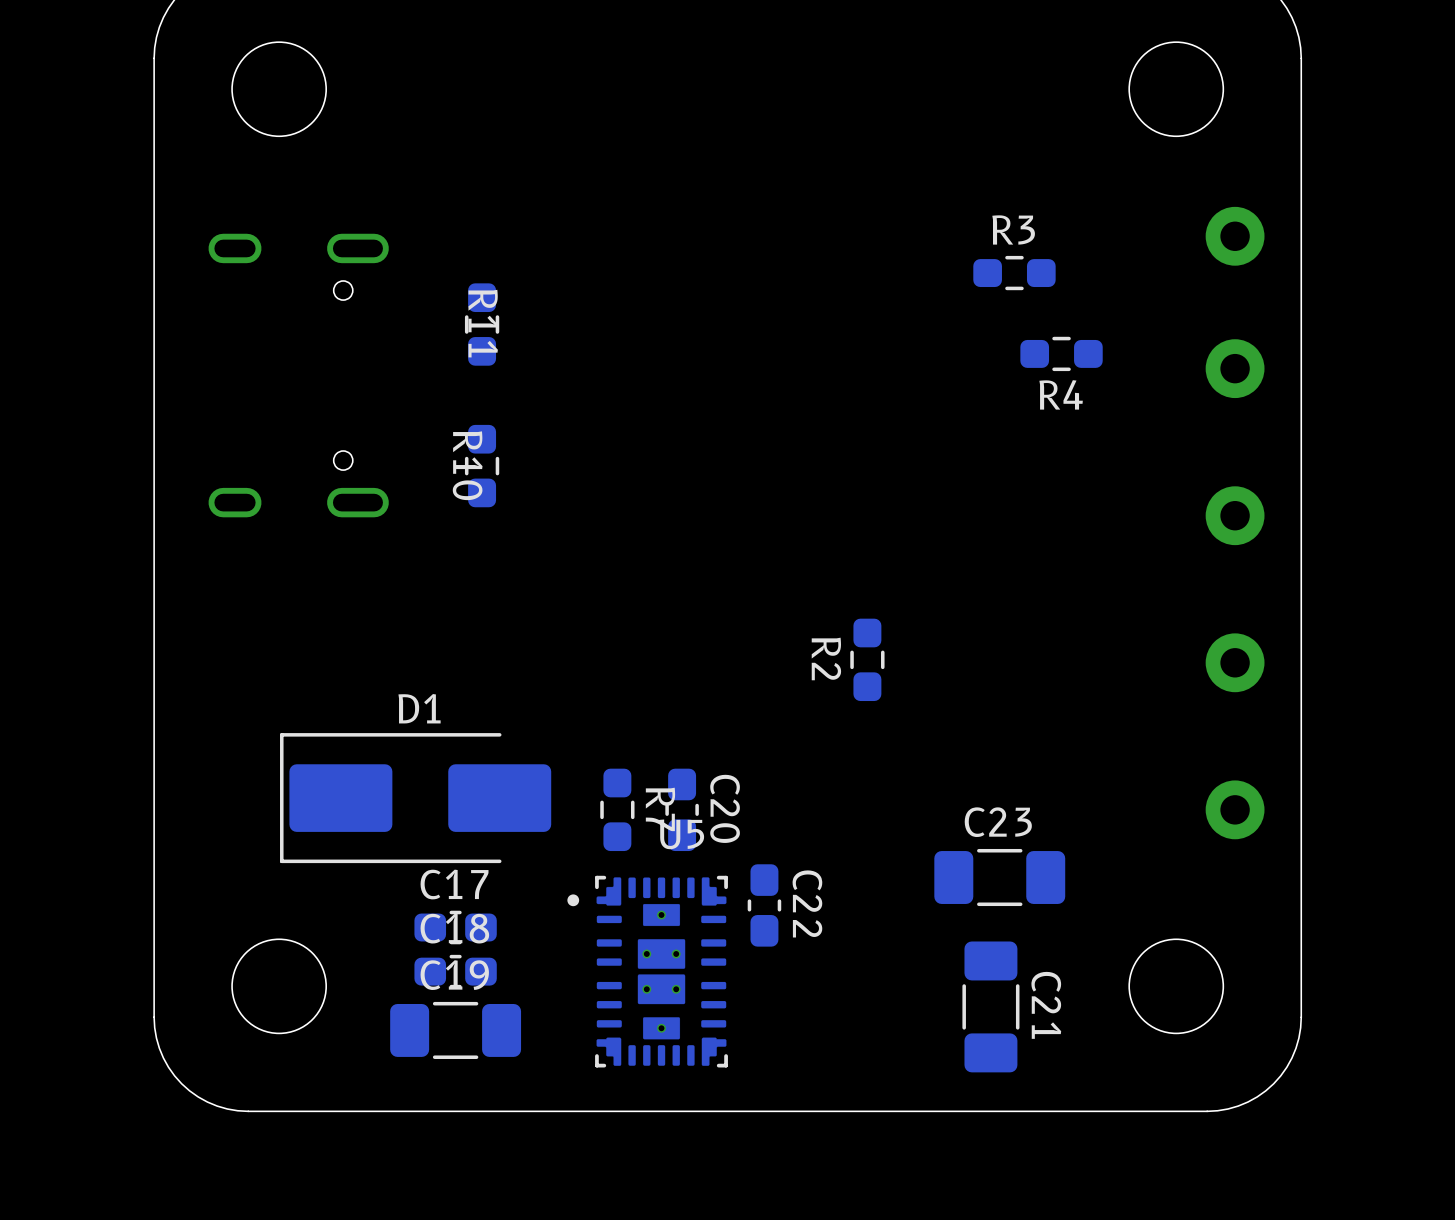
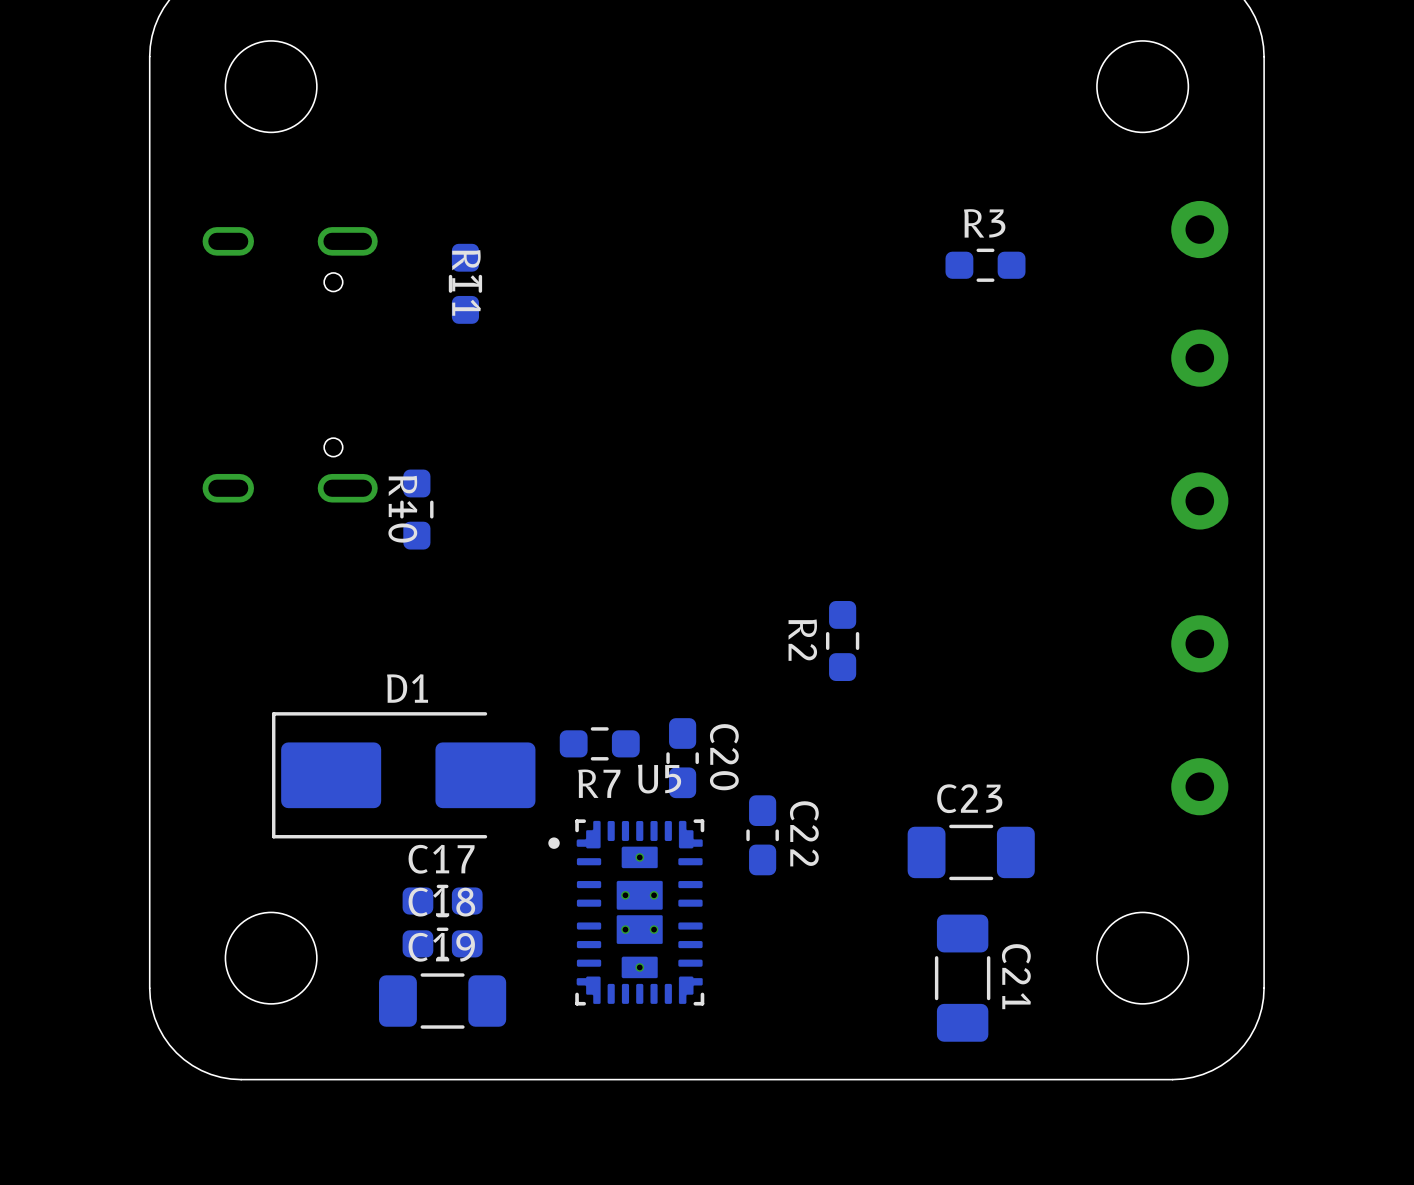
R11 position: (482, 324) -> (465, 283)
R4: (1061, 353) -> none
R10 position: (482, 466) -> (416, 509)
R7 rotation: 0° (617, 809) -> 90° clockwise (599, 743)
C20 position: (682, 809) -> (682, 758)
C22 position: (764, 905) -> (762, 835)
U5 position: (647, 971) -> (626, 912)

